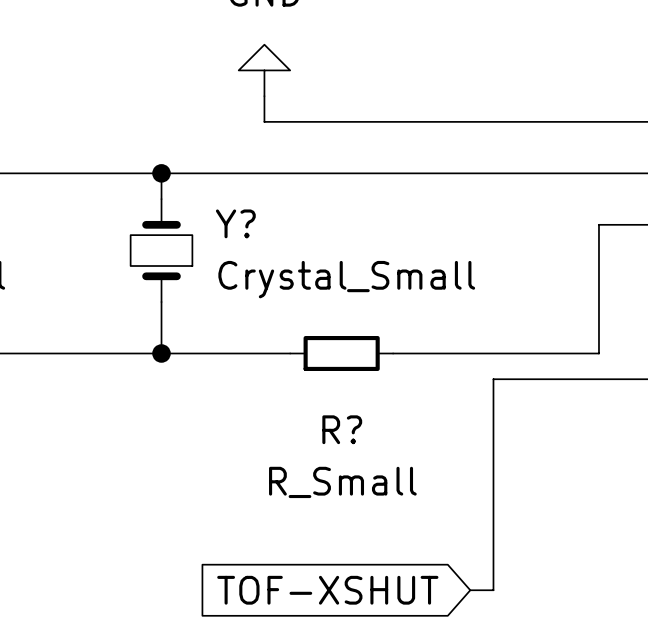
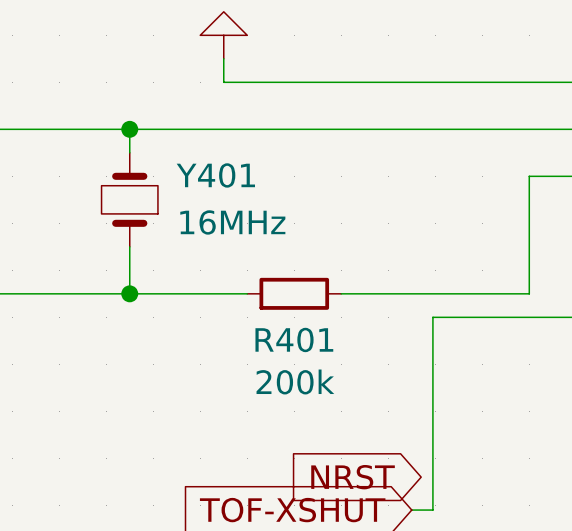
Y? name: Y? (235, 223) -> Y401 (215, 175)
Y? value: Crystal_Small (346, 279) -> 16MHz (232, 222)
R? name: R? (342, 429) -> R401 (294, 339)
R? value: R_Small (342, 482) -> 200k (295, 381)
global label: none -> NRST (353, 477)

